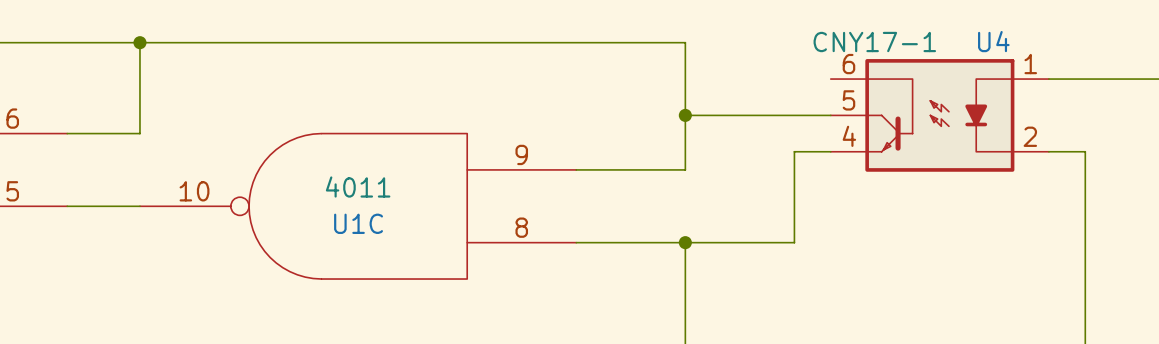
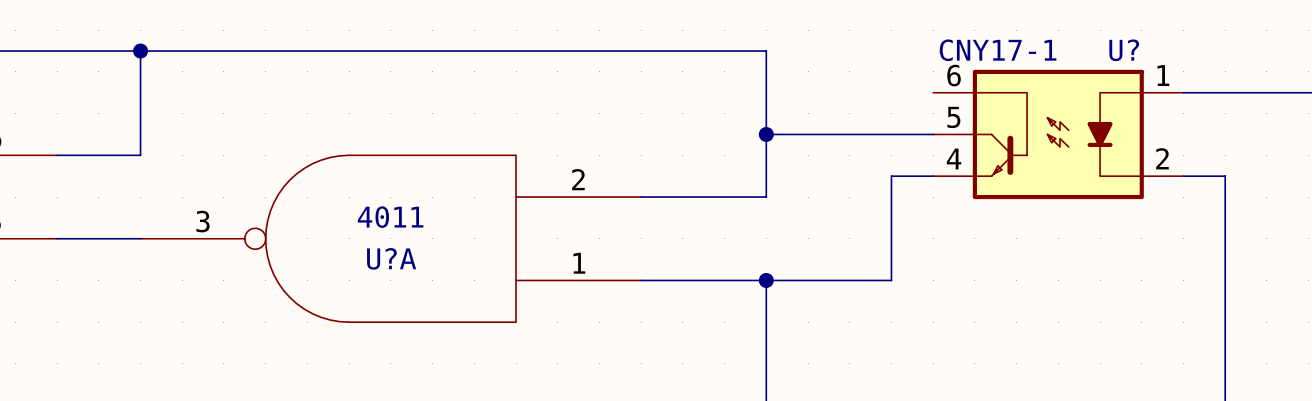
U4 name: U4 (993, 41) -> U? (1124, 50)
U1C pin number: 9 (521, 154) -> 2 (578, 179)
U1C pin number: 10 (194, 191) -> 3 (203, 221)
U1C name: U1C (358, 223) -> U?A (391, 258)
U1C pin number: 8 (521, 227) -> 1 (579, 263)

